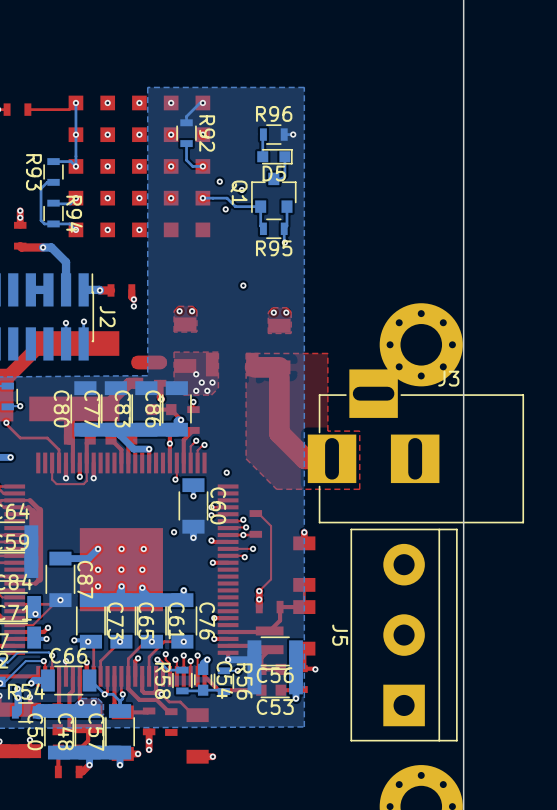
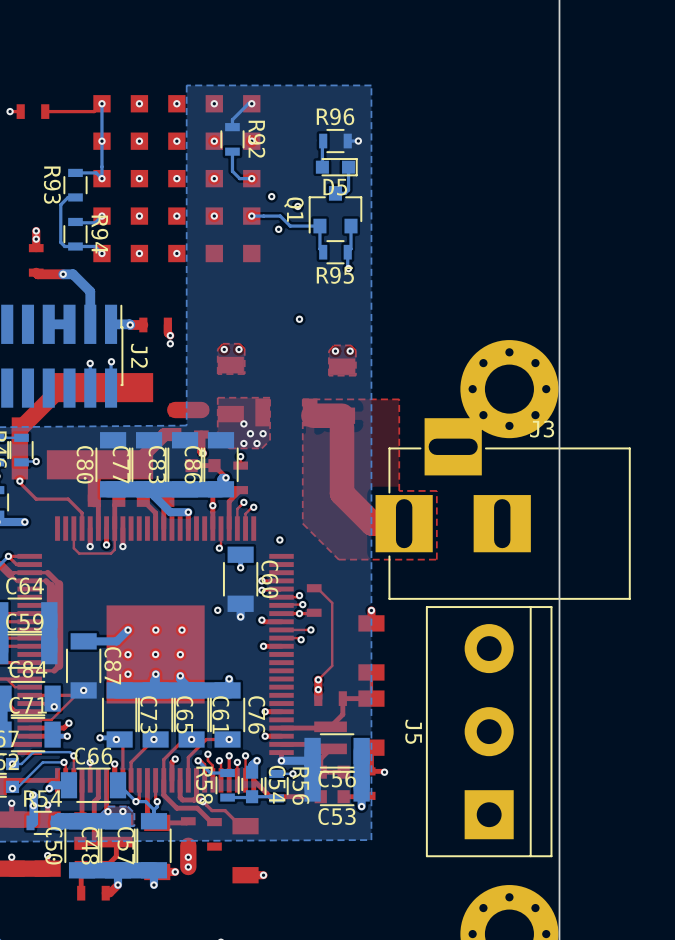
top track width: thin (149, 731) (149, 749) -> thick (188, 845) (188, 867)

